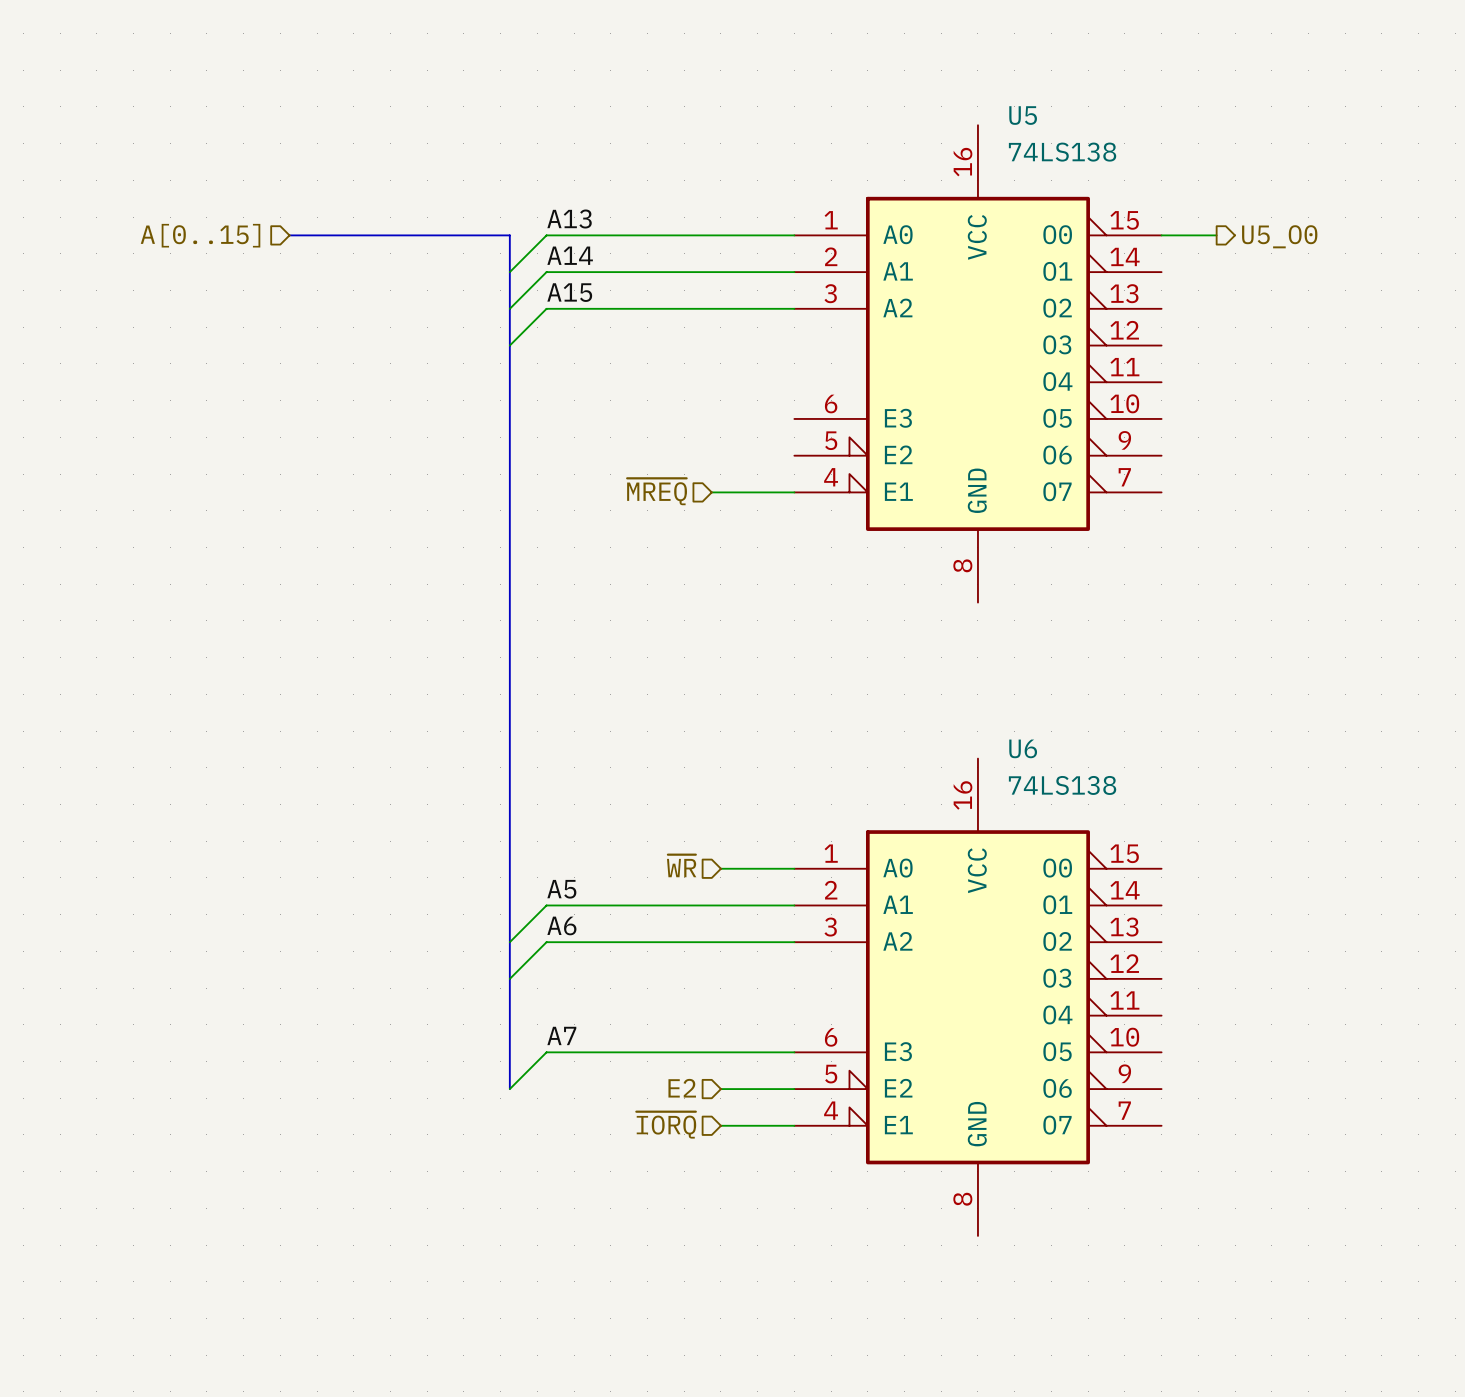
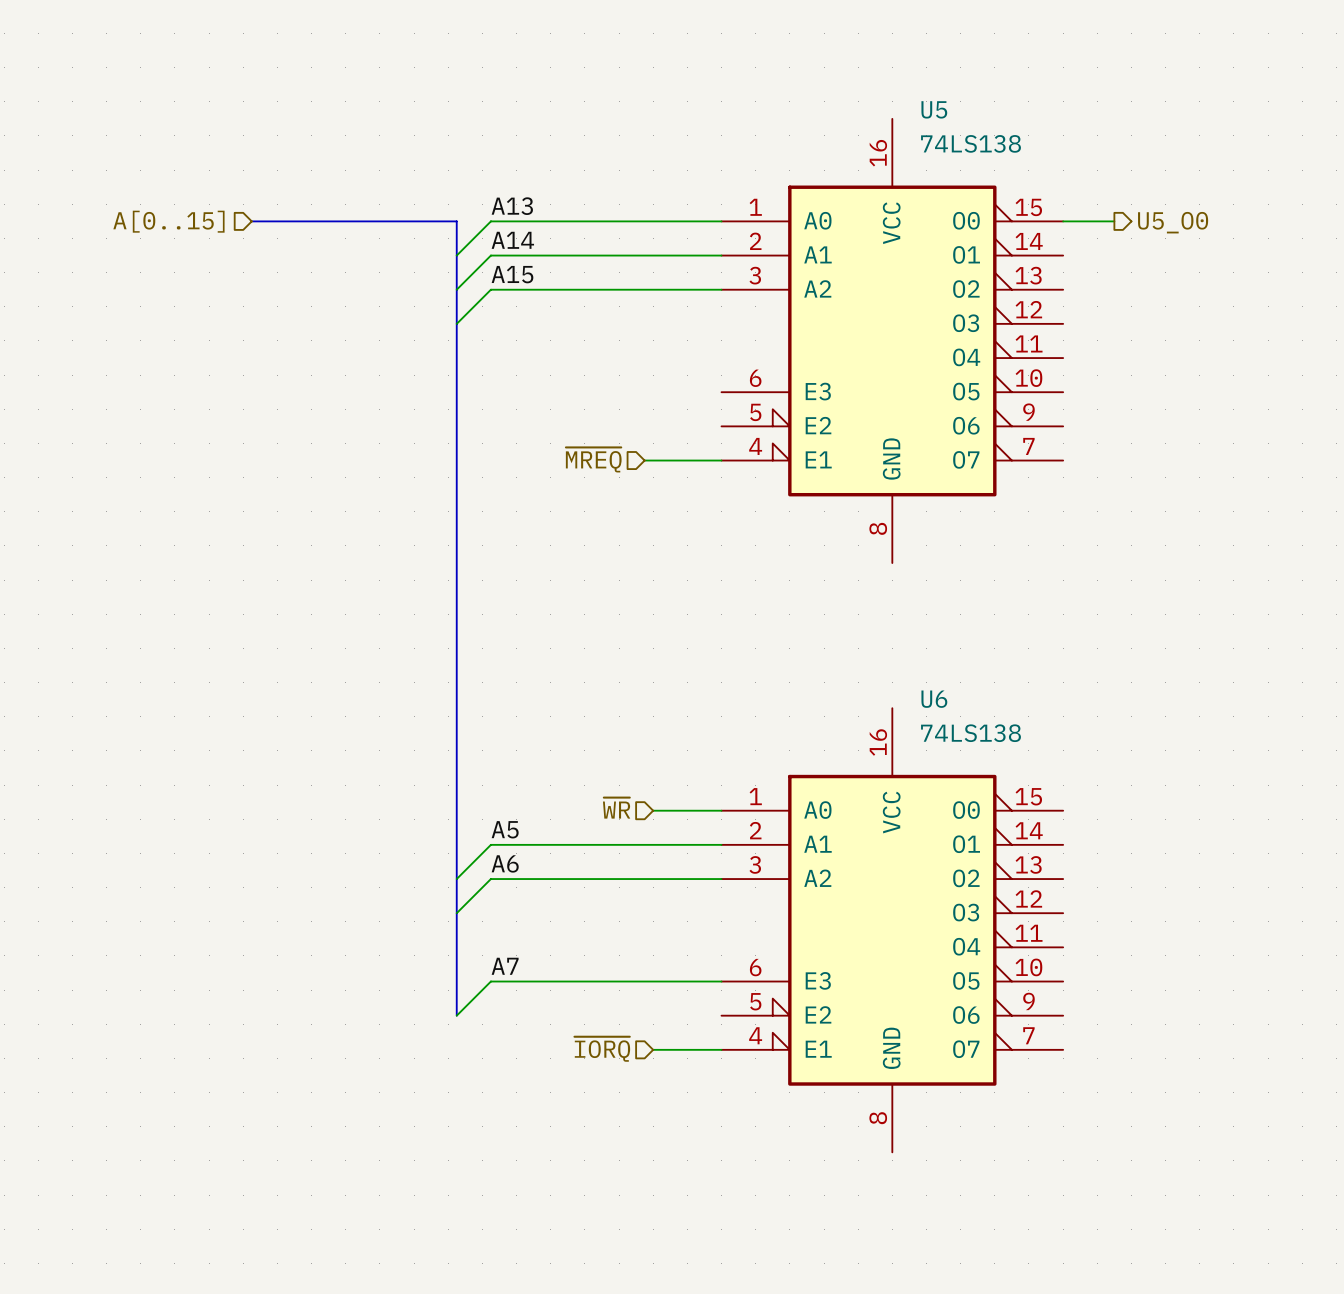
hierarchical label: E2 (682, 1088) -> none
wire: (720, 1089) (794, 1089) -> none

